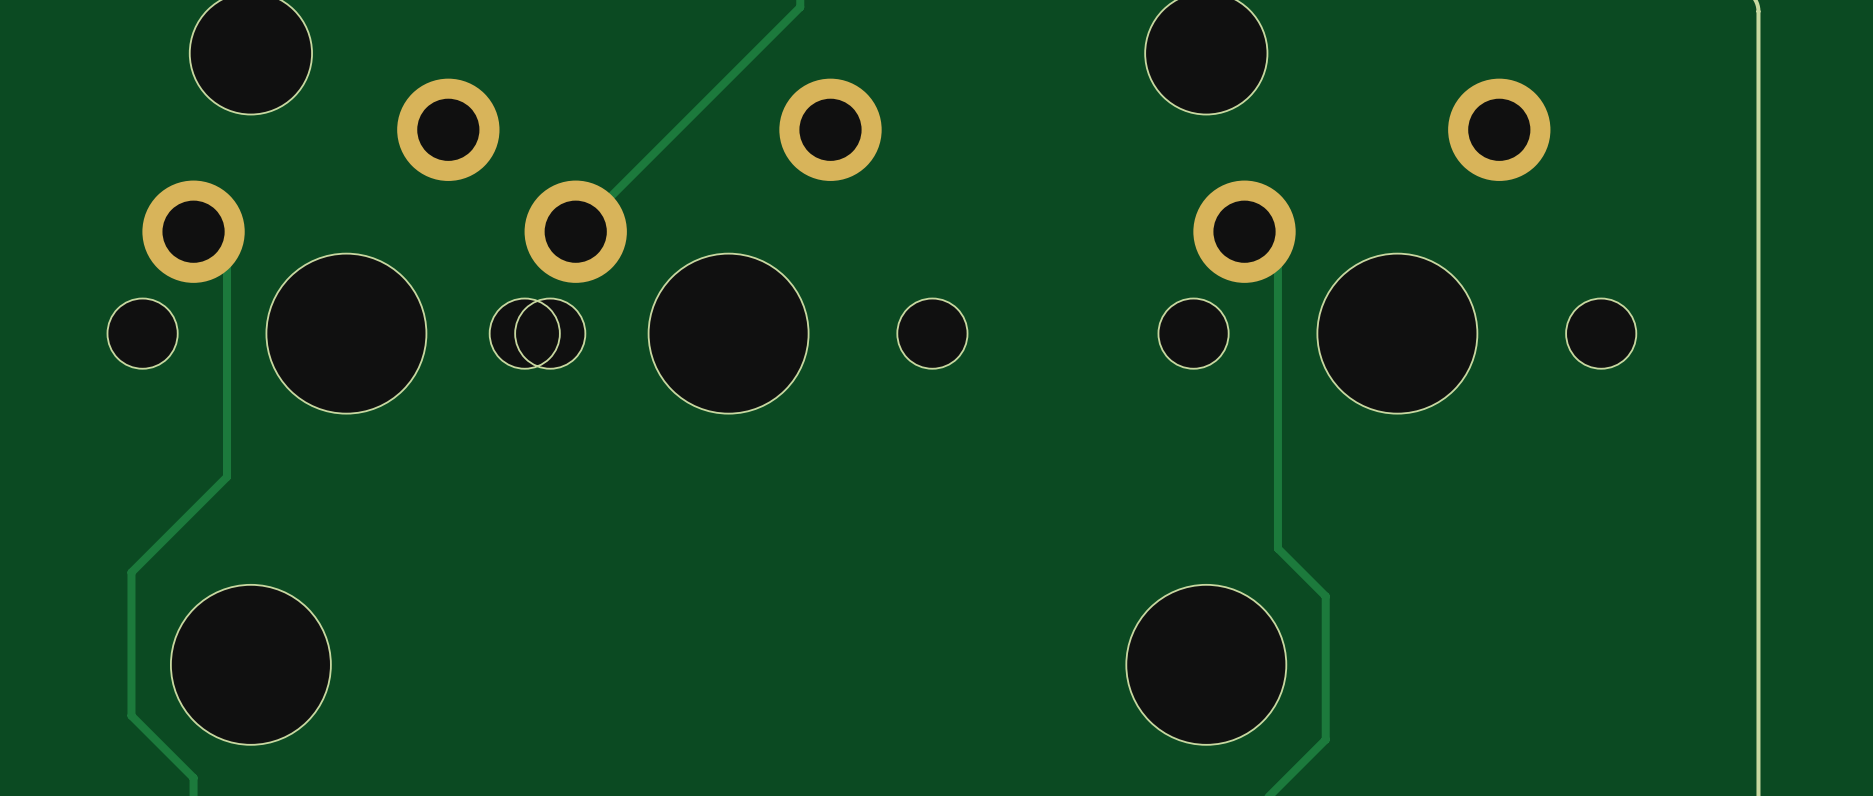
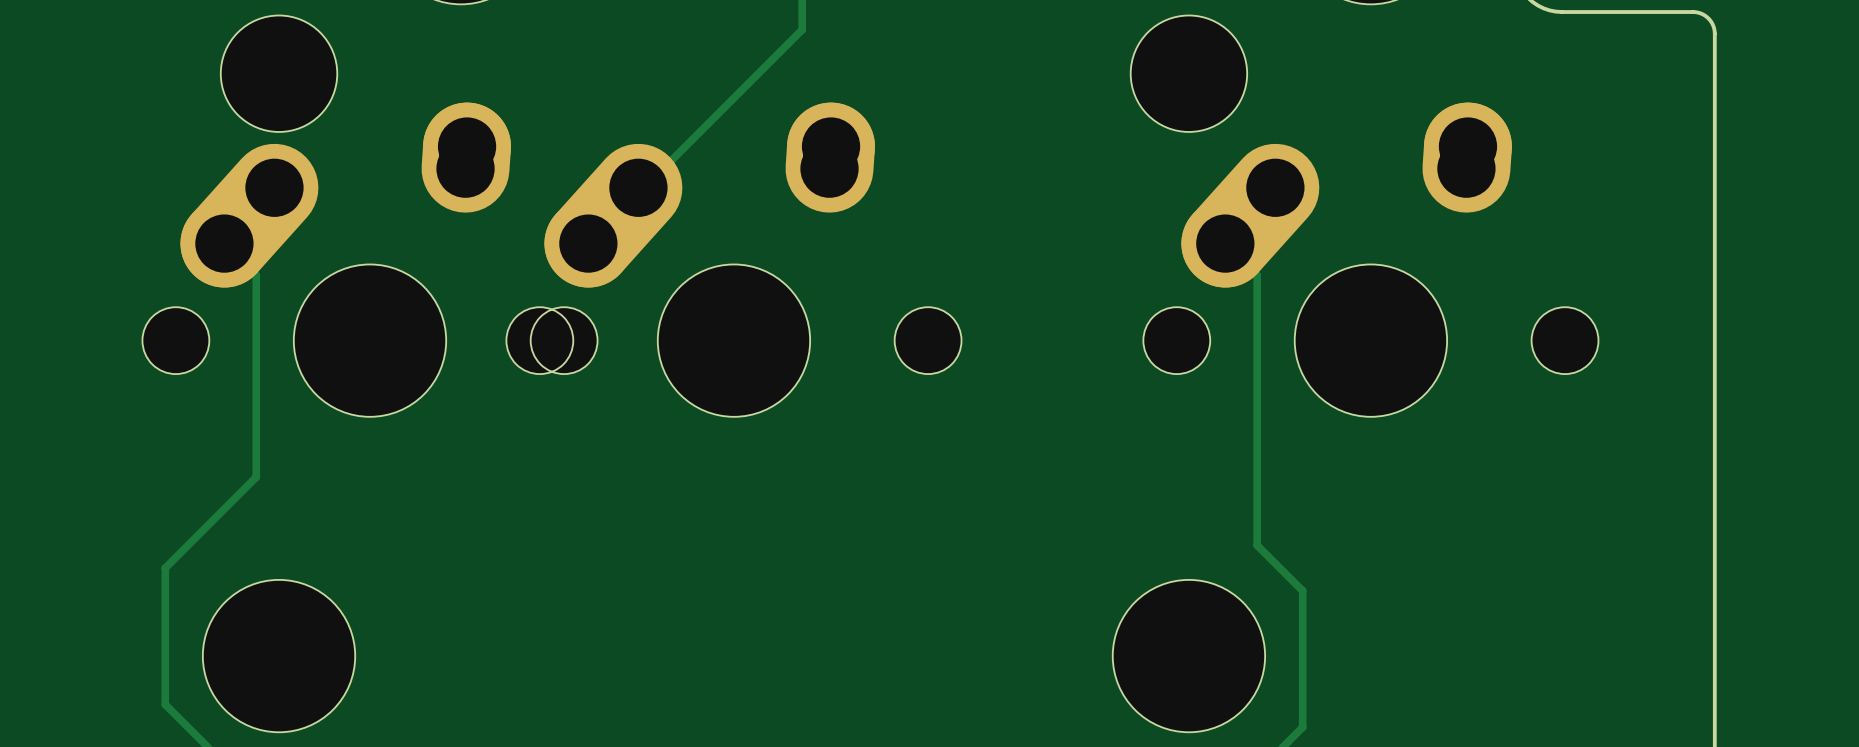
part footprint: [107, 78, 586, 414] -> [142, 102, 598, 417]
part footprint: [489, 78, 968, 414] -> [506, 102, 962, 417]
part footprint: [1158, 78, 1637, 414] -> [1143, 102, 1599, 417]

